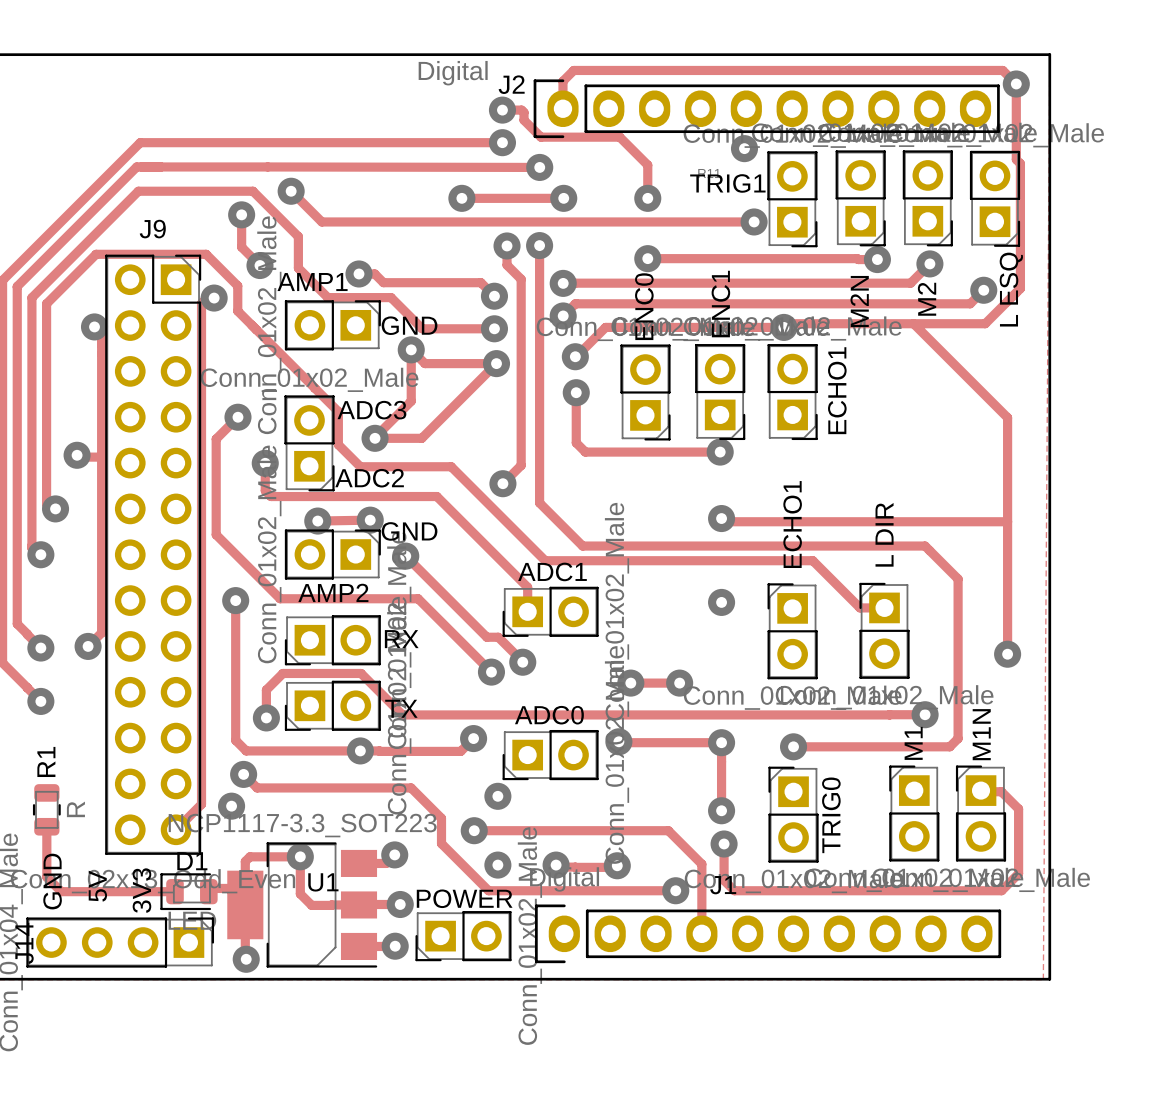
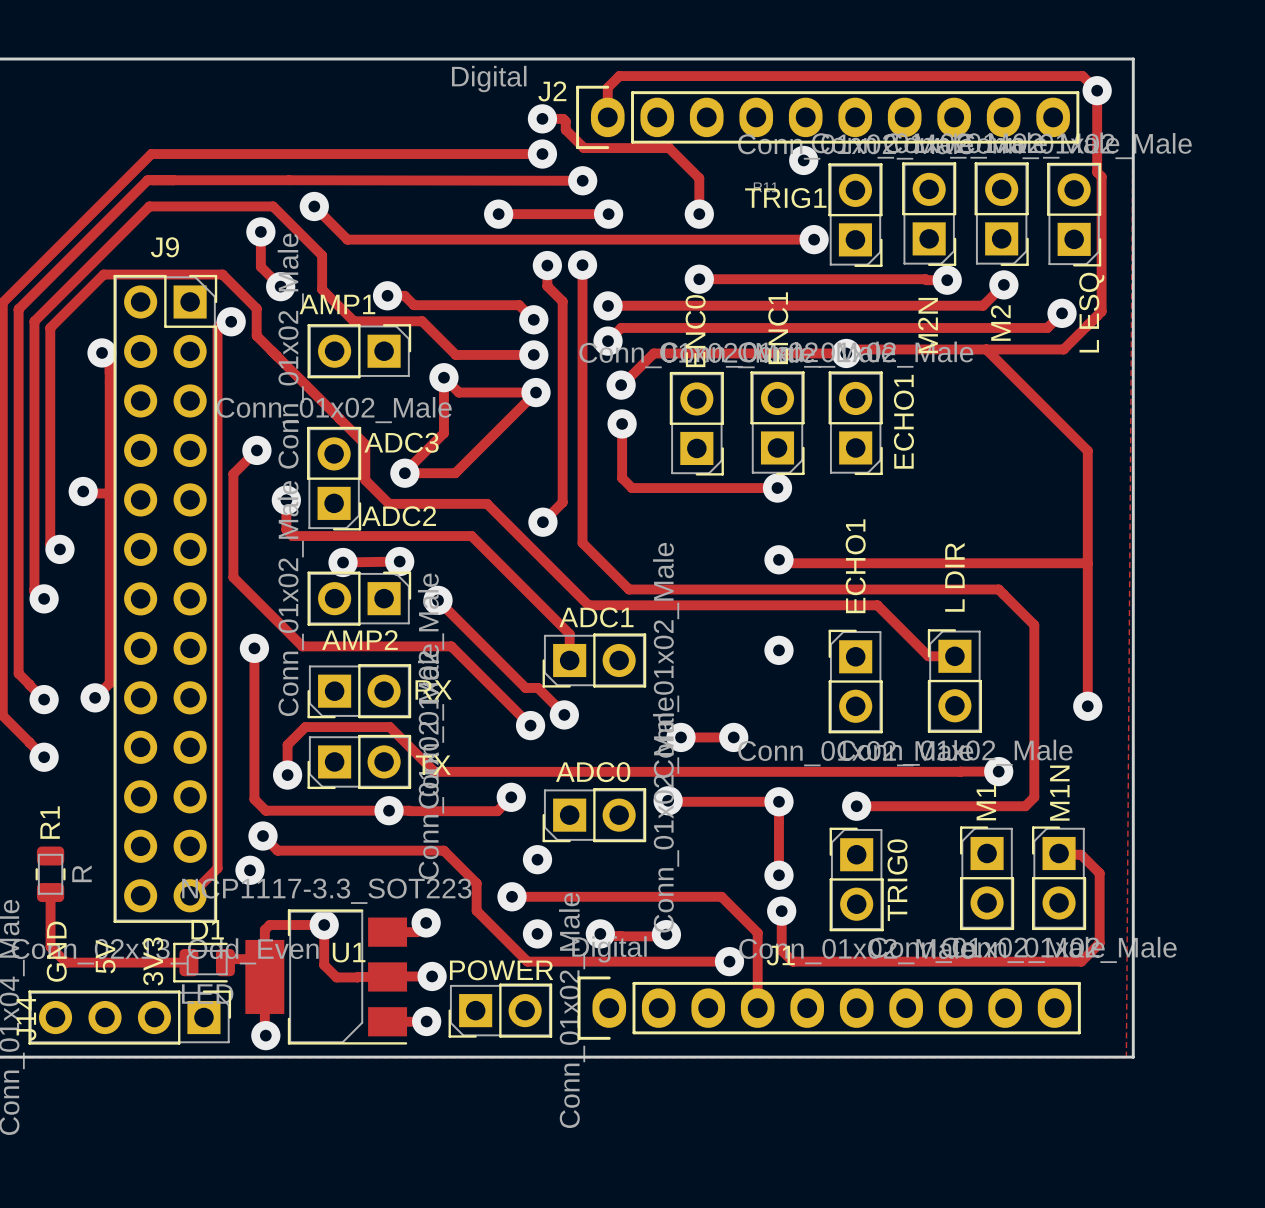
text: GND (409, 325) -> none
text: GND (409, 531) -> none

